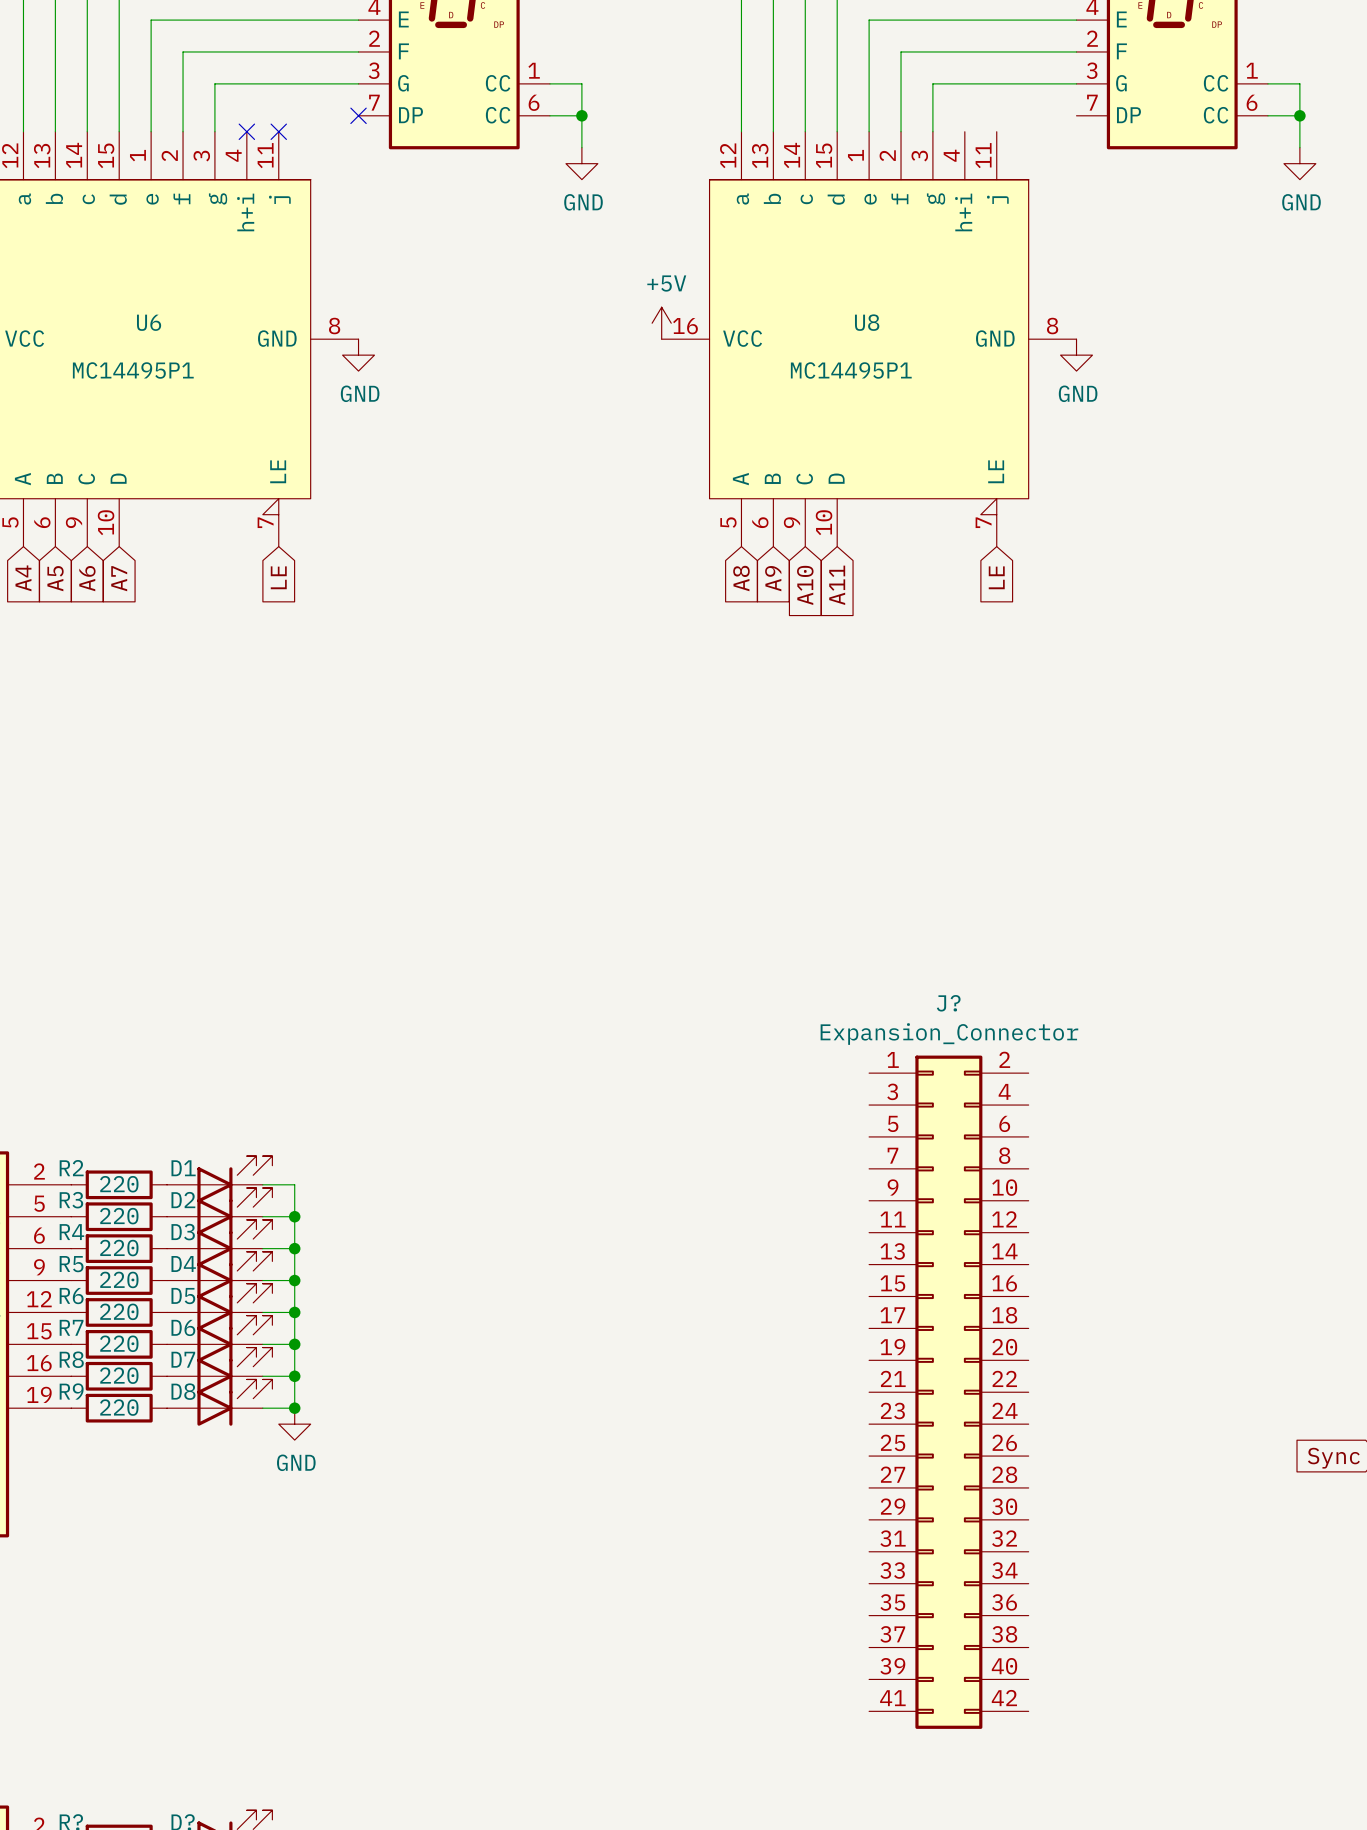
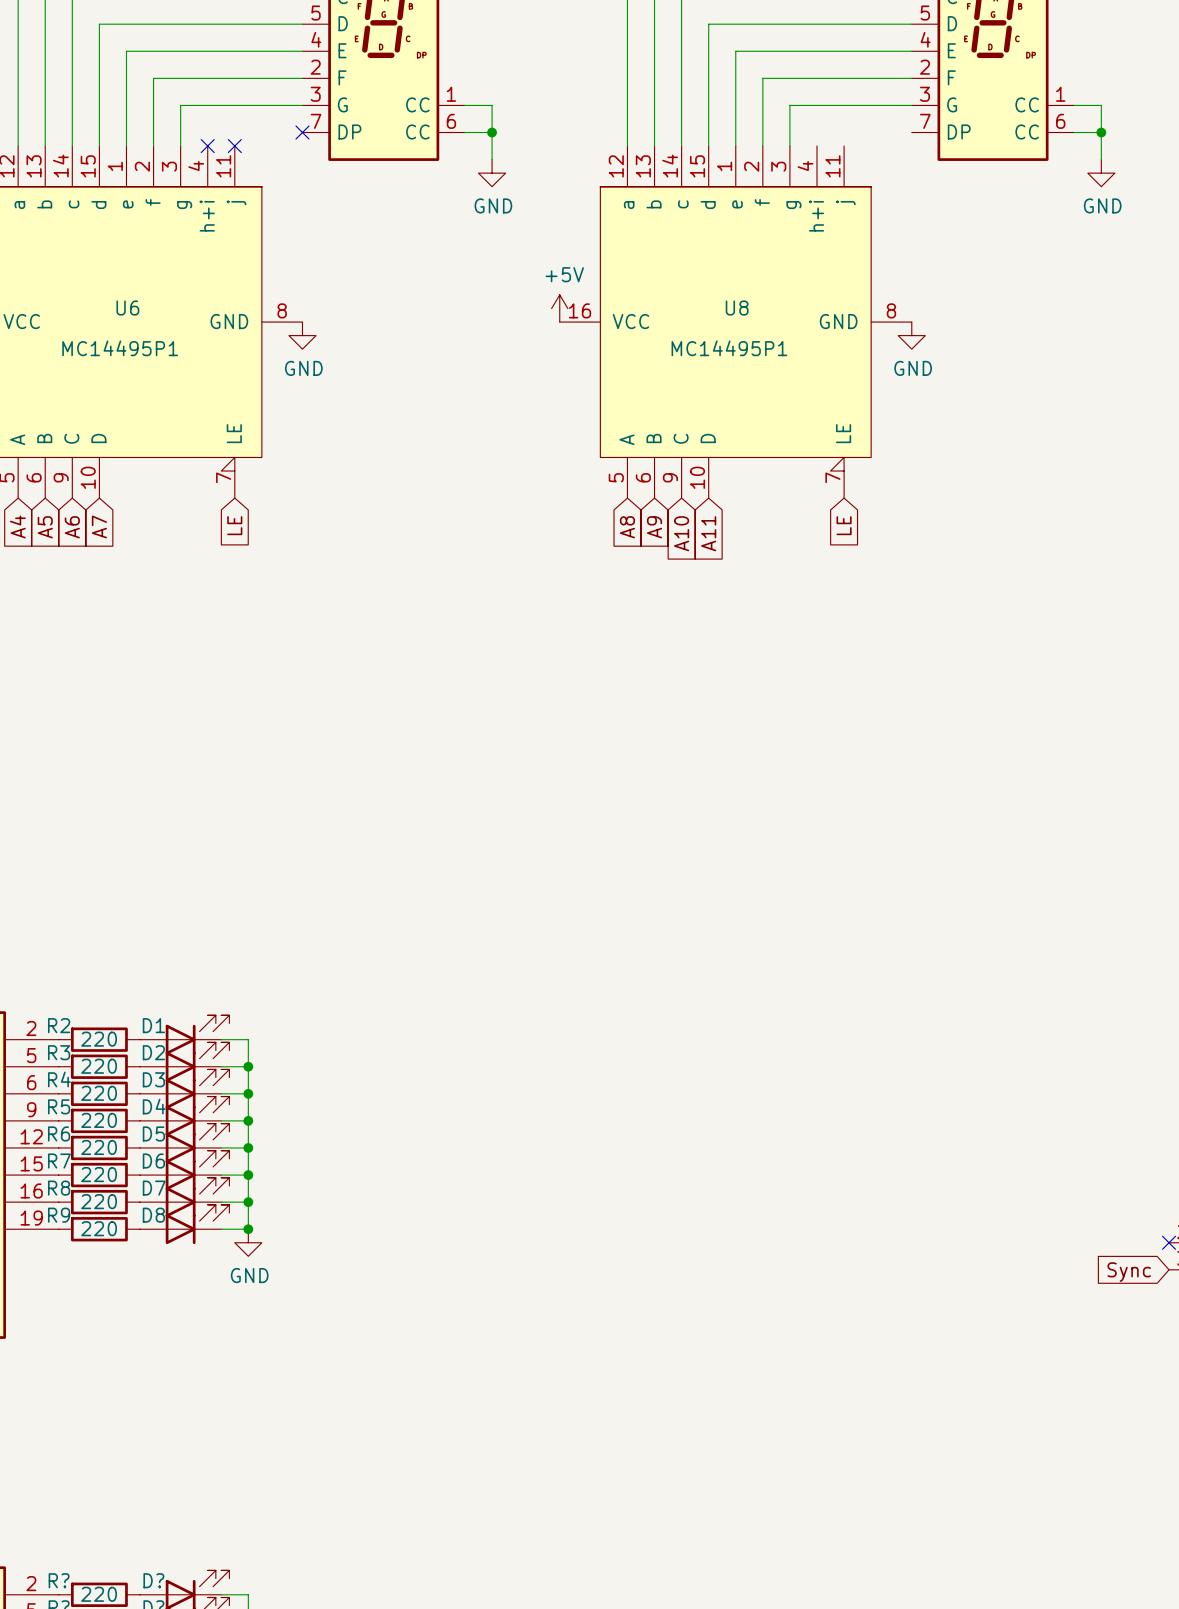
J?: Expansion_Connector (948, 1392) -> none

